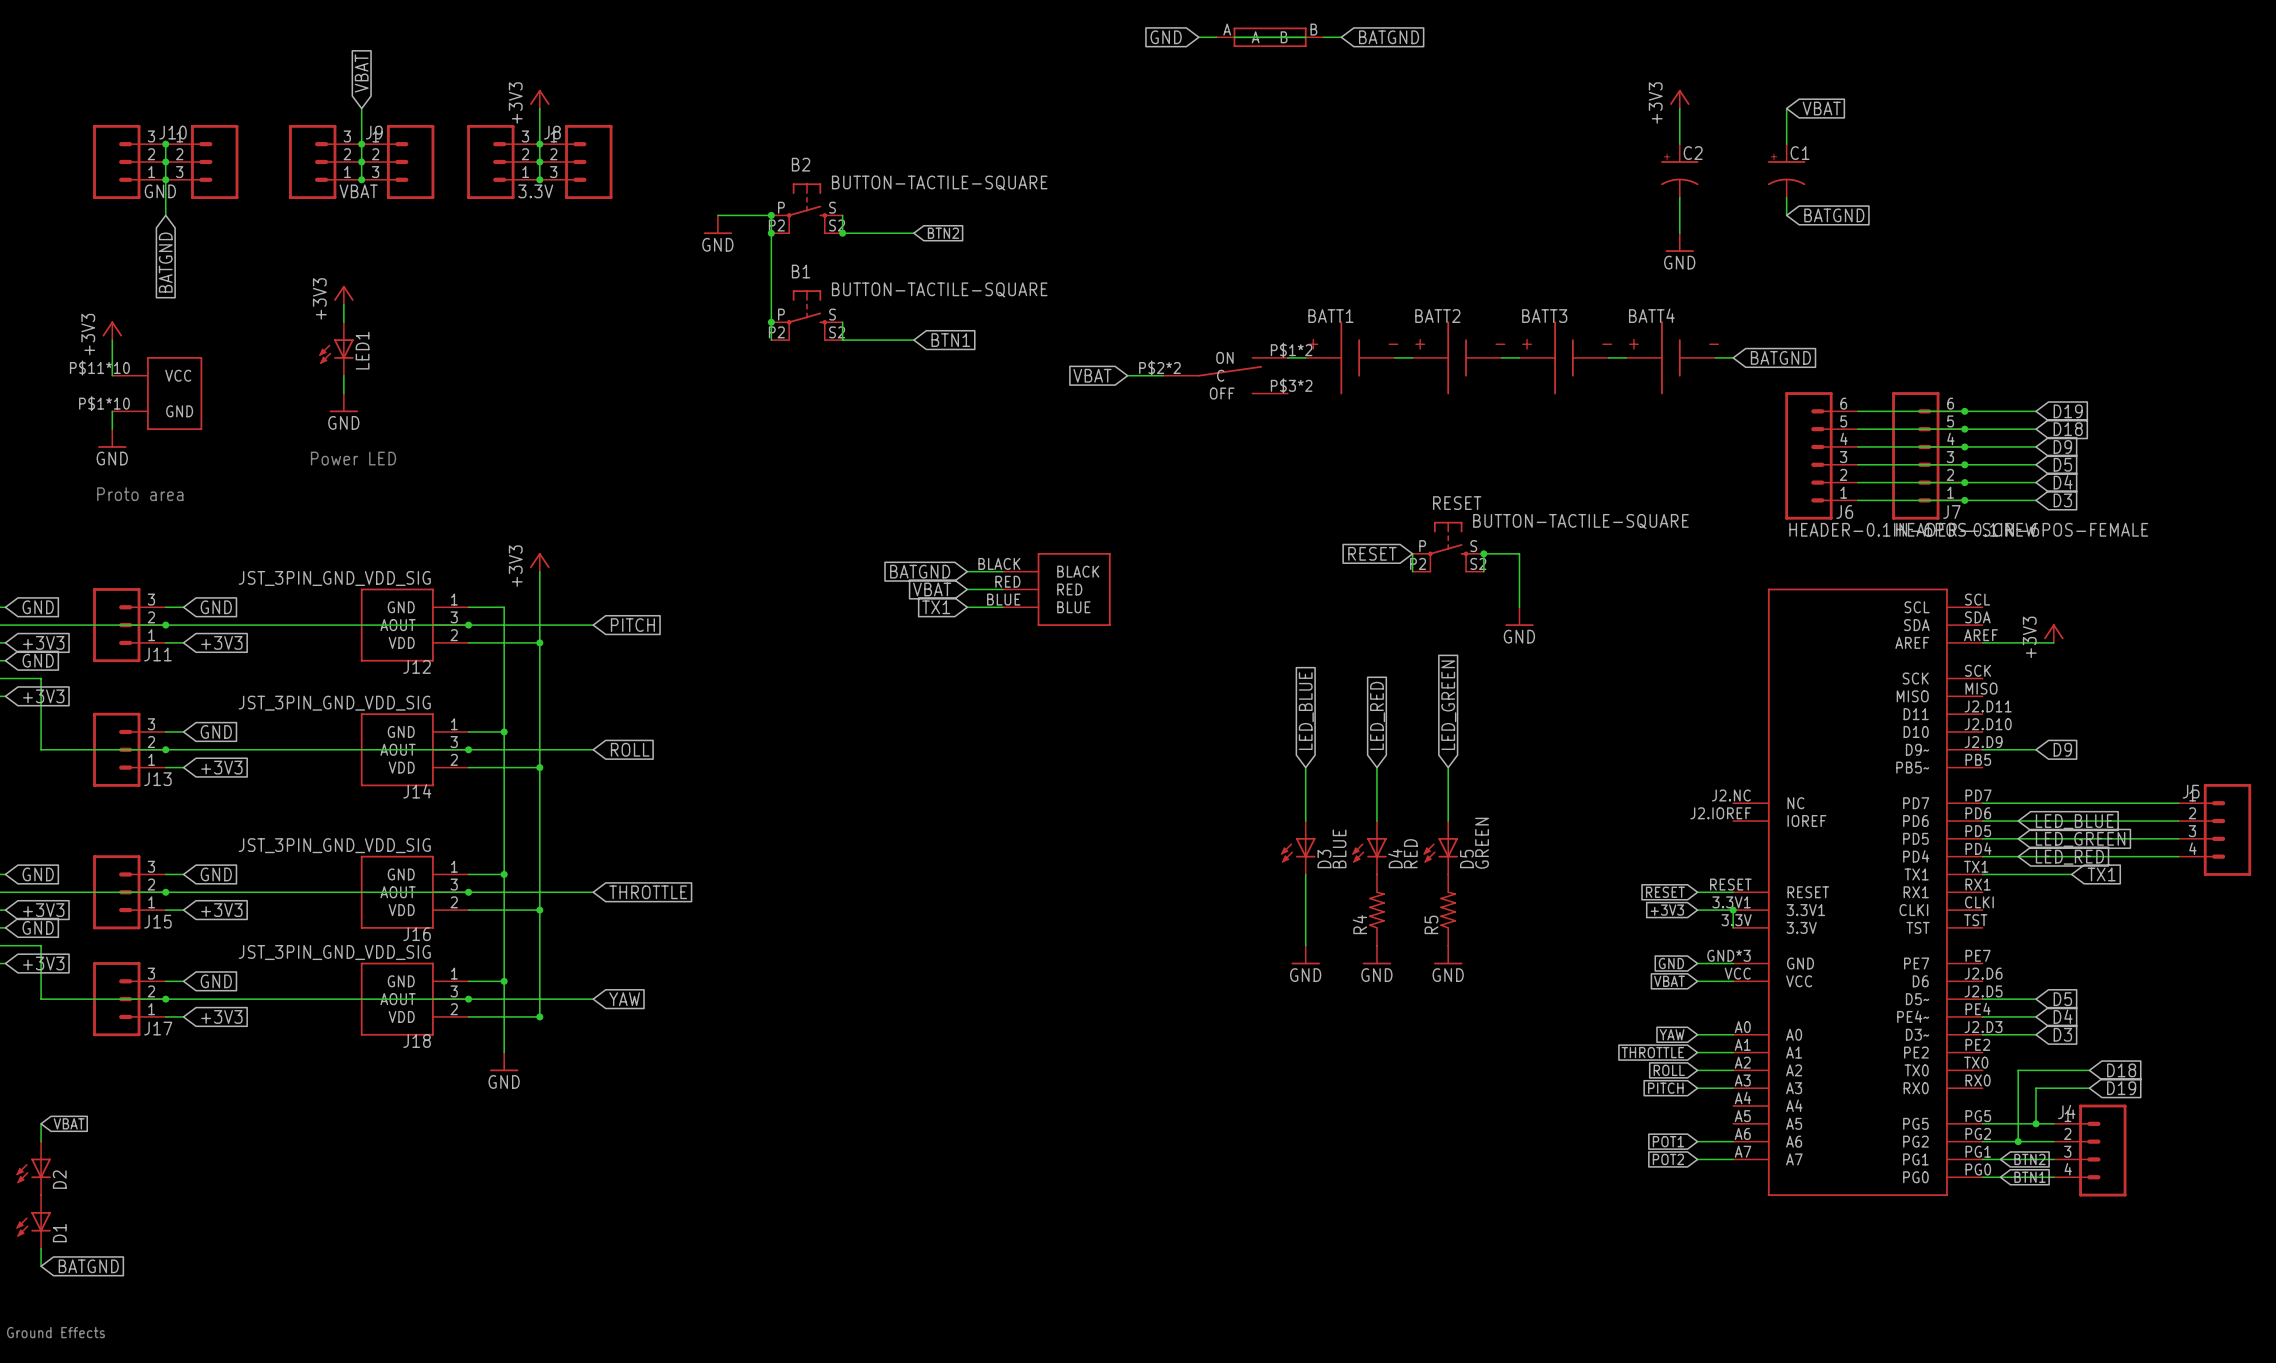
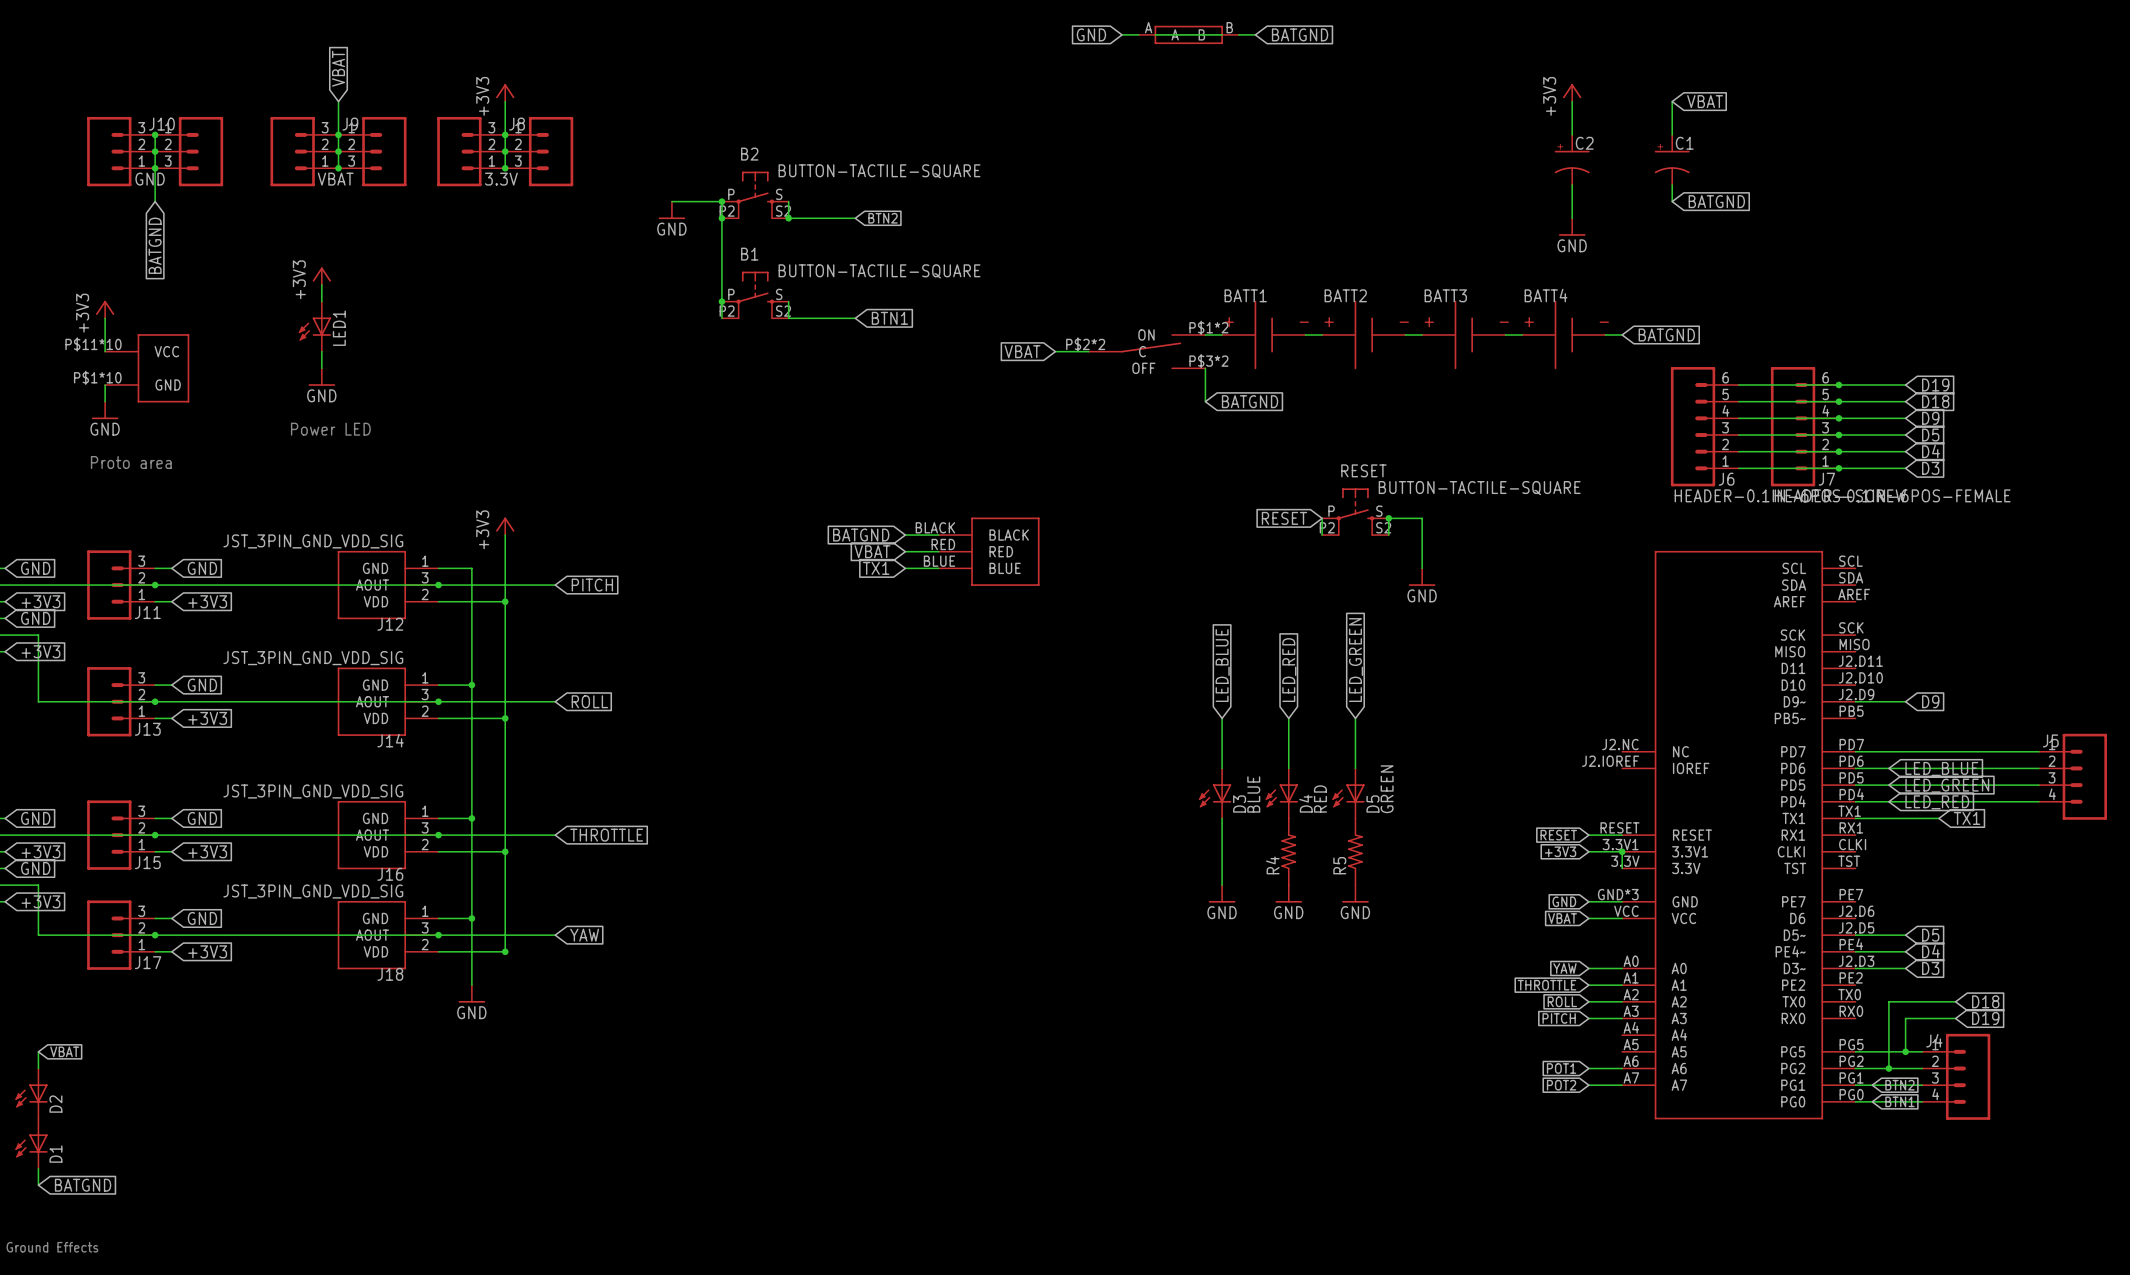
wire: none -> (1205, 368) (1205, 401)
global label: none -> BATGND (1250, 401)
power symbol: +3V3 (2053, 633) -> none
wire: (1982, 642) (2053, 642) -> none

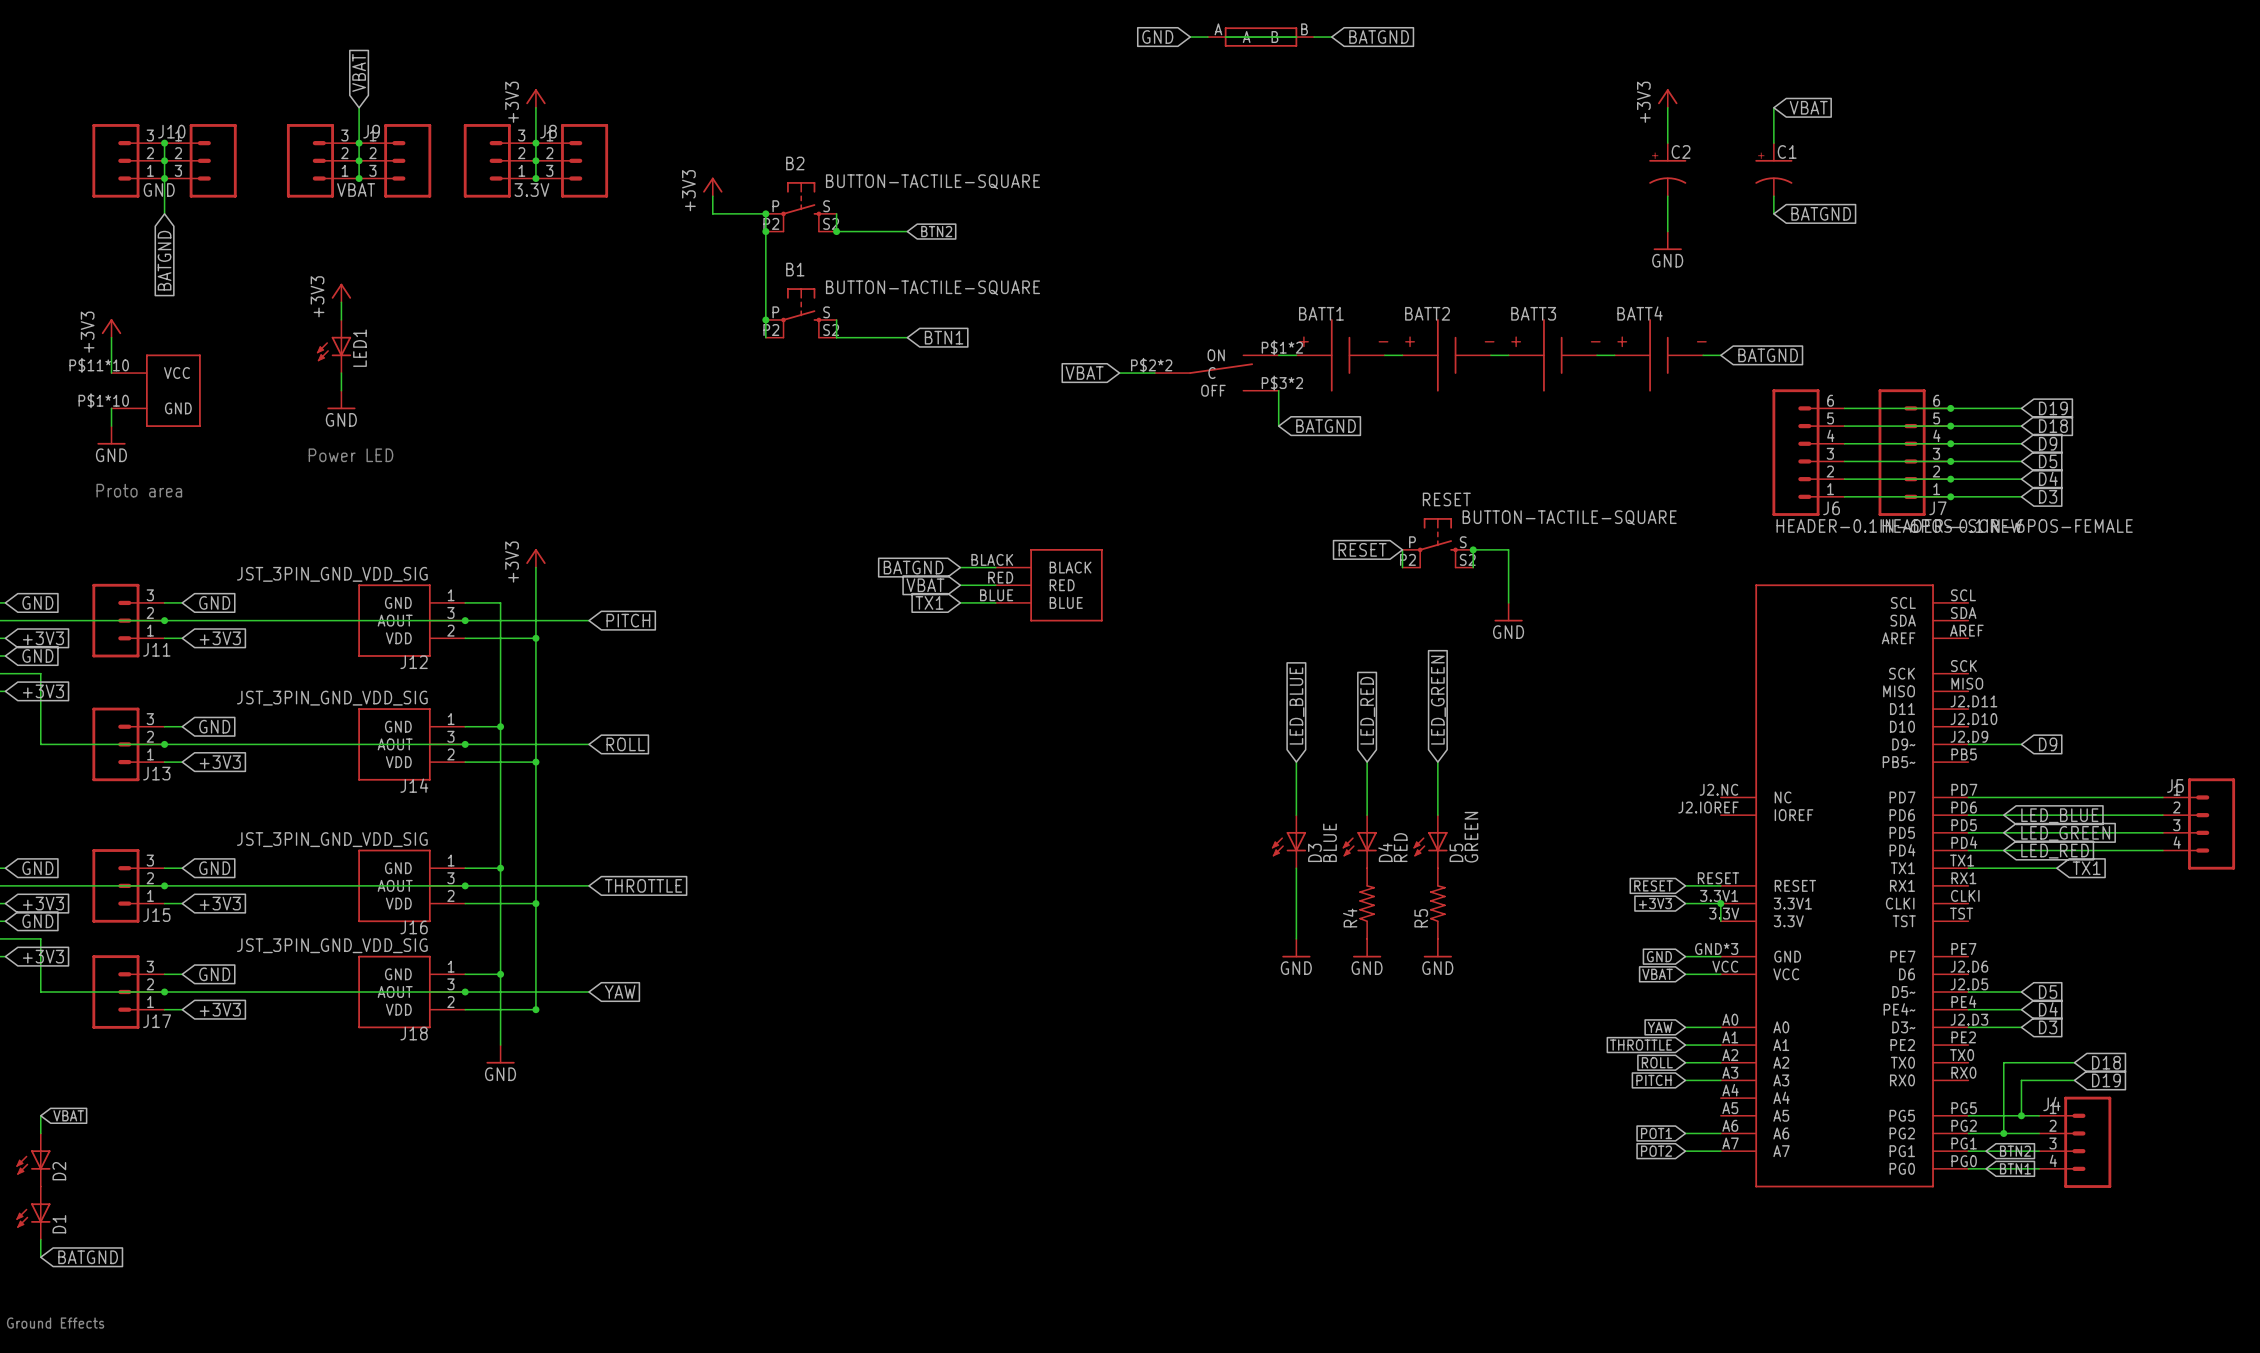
power symbol: none -> +3V3 (712, 186)
wire: none -> (712, 196) (712, 213)
power symbol: GND (671, 210) -> none

